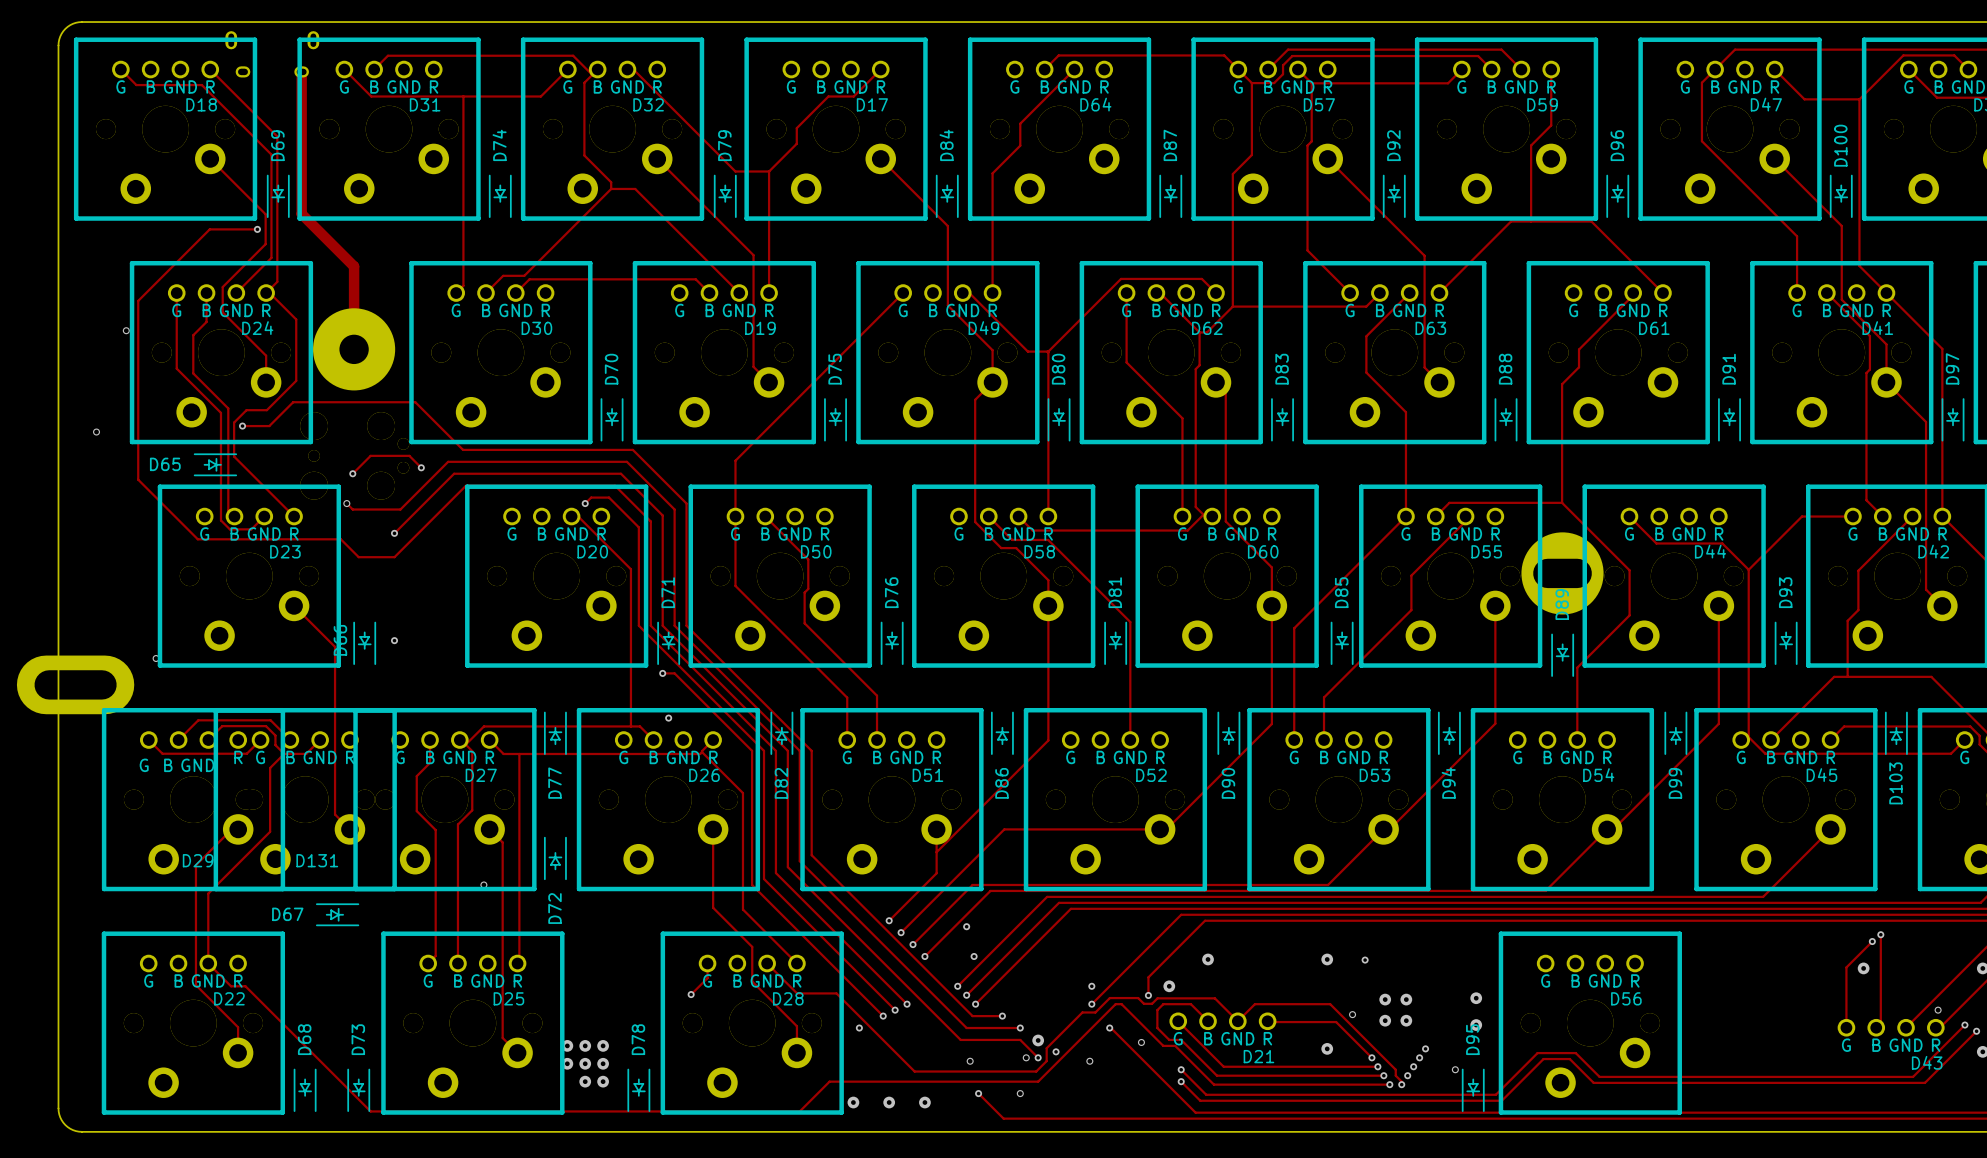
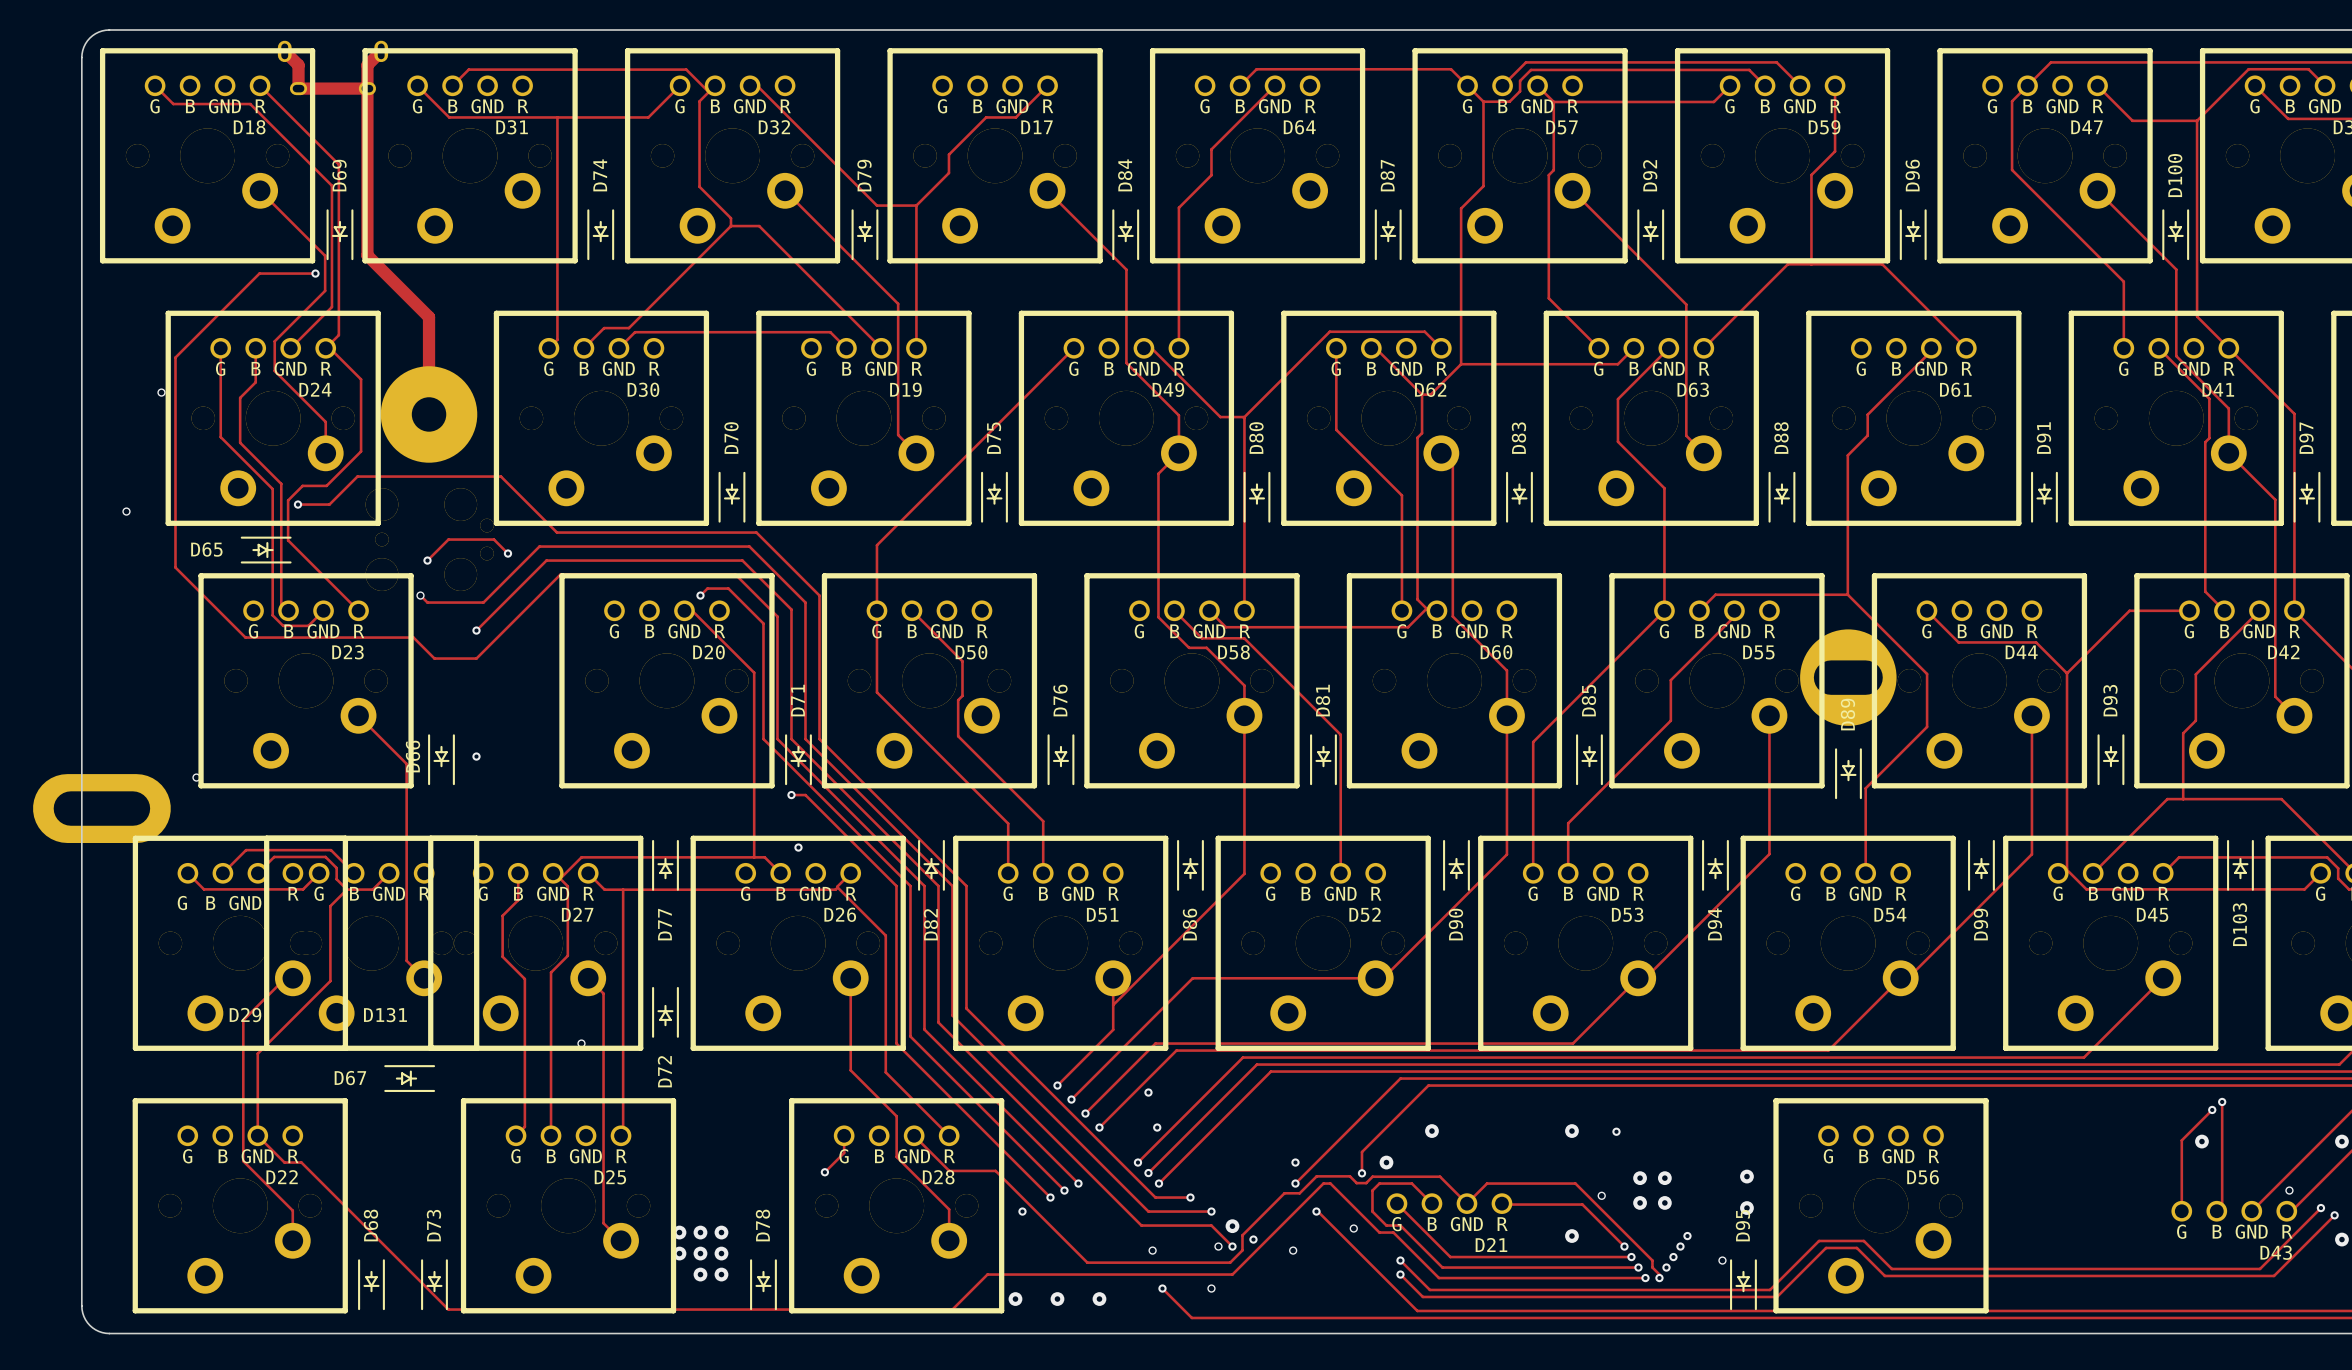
track: none -> (284, 51) (298, 65) (298, 88) (367, 88) (367, 65) (381, 51)

